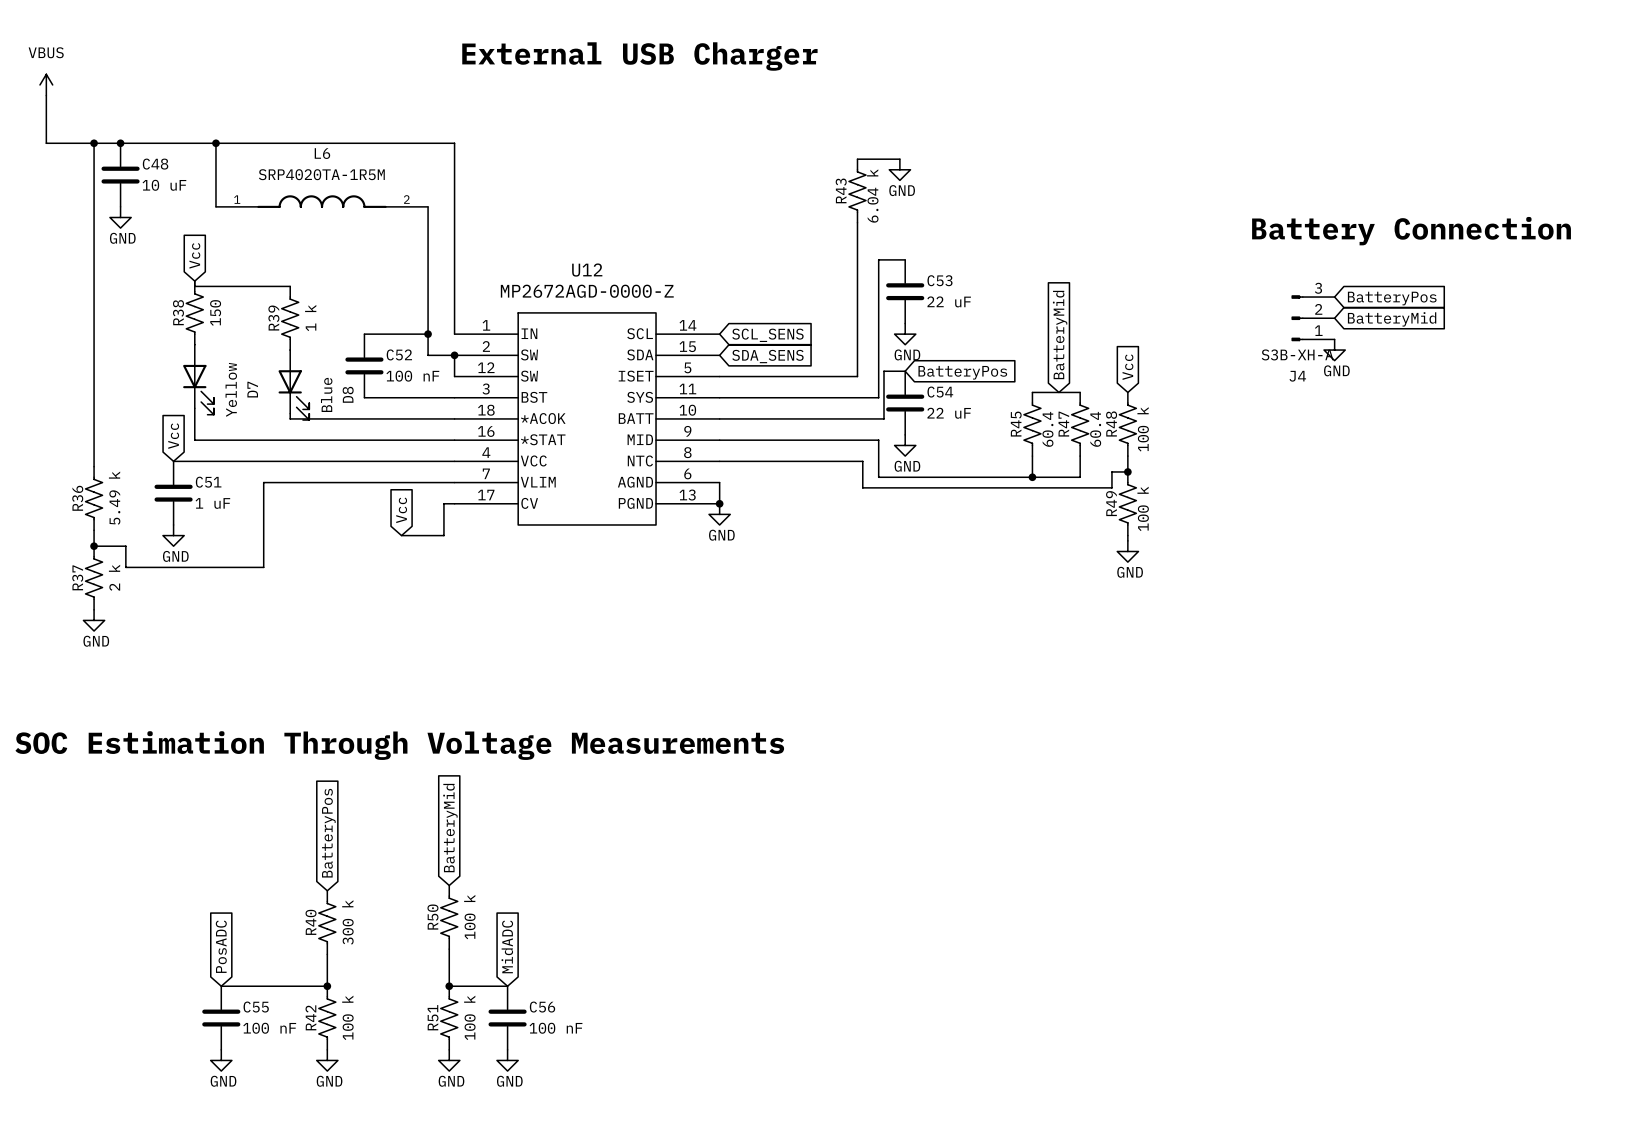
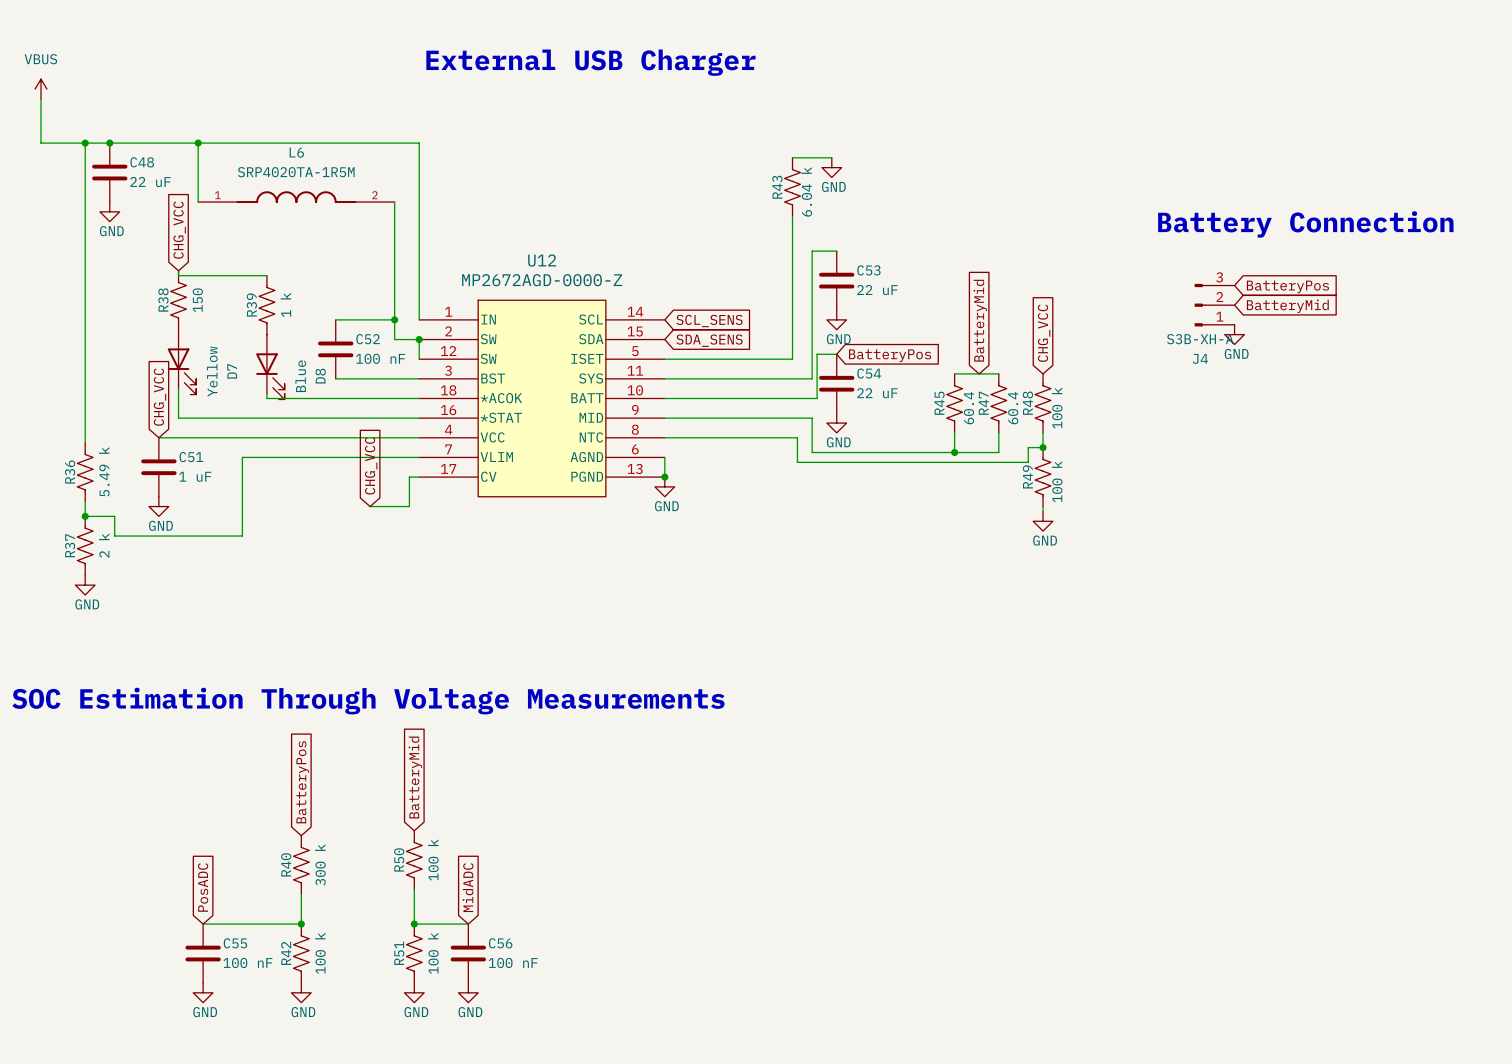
C48 value: 10 uF (164, 185) -> 22 uF (150, 182)
global label: Vcc (194, 255) -> CHG_VCC (179, 230)
global label: Vcc (1127, 367) -> CHG_VCC (1044, 333)
global label: Vcc (173, 436) -> CHG_VCC (160, 397)
global label: Vcc (401, 510) -> CHG_VCC (371, 465)

